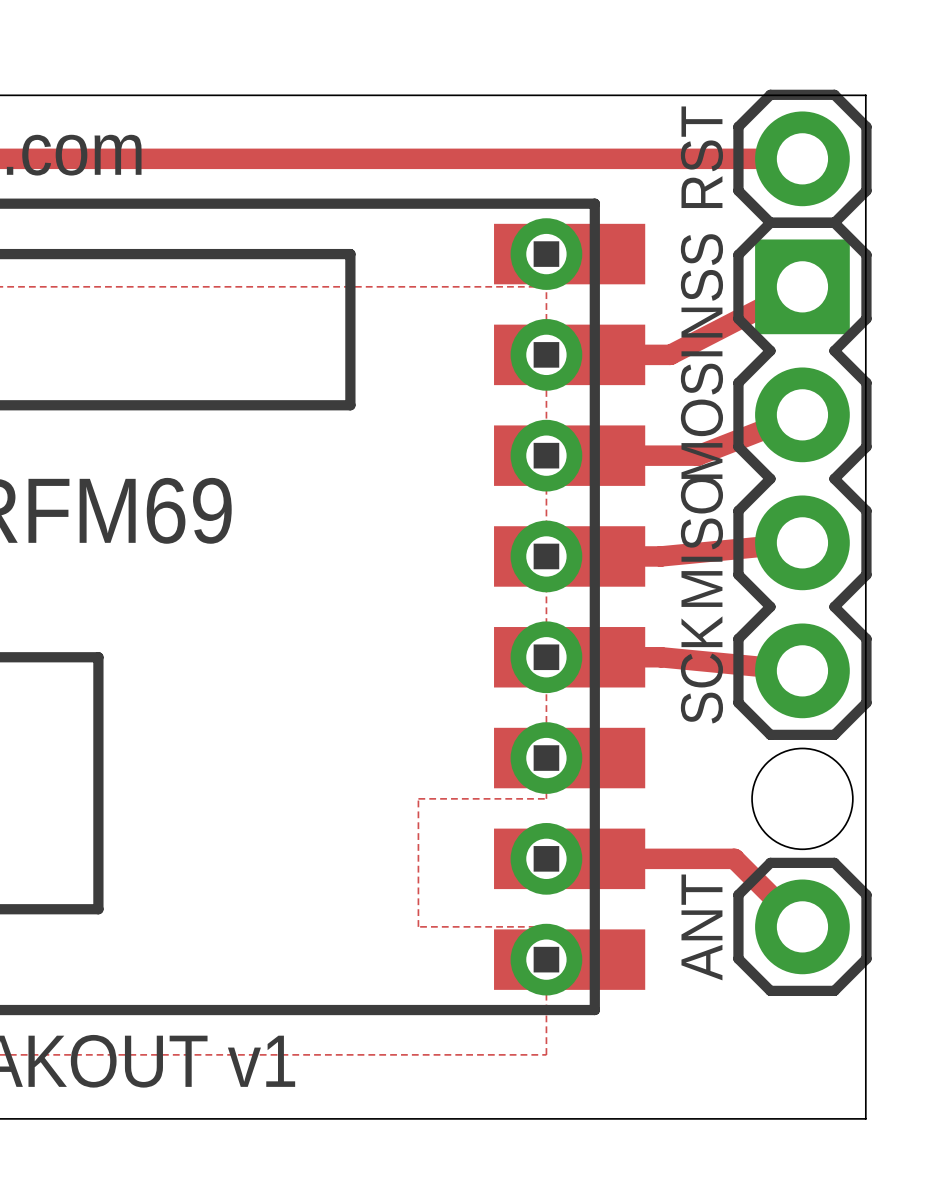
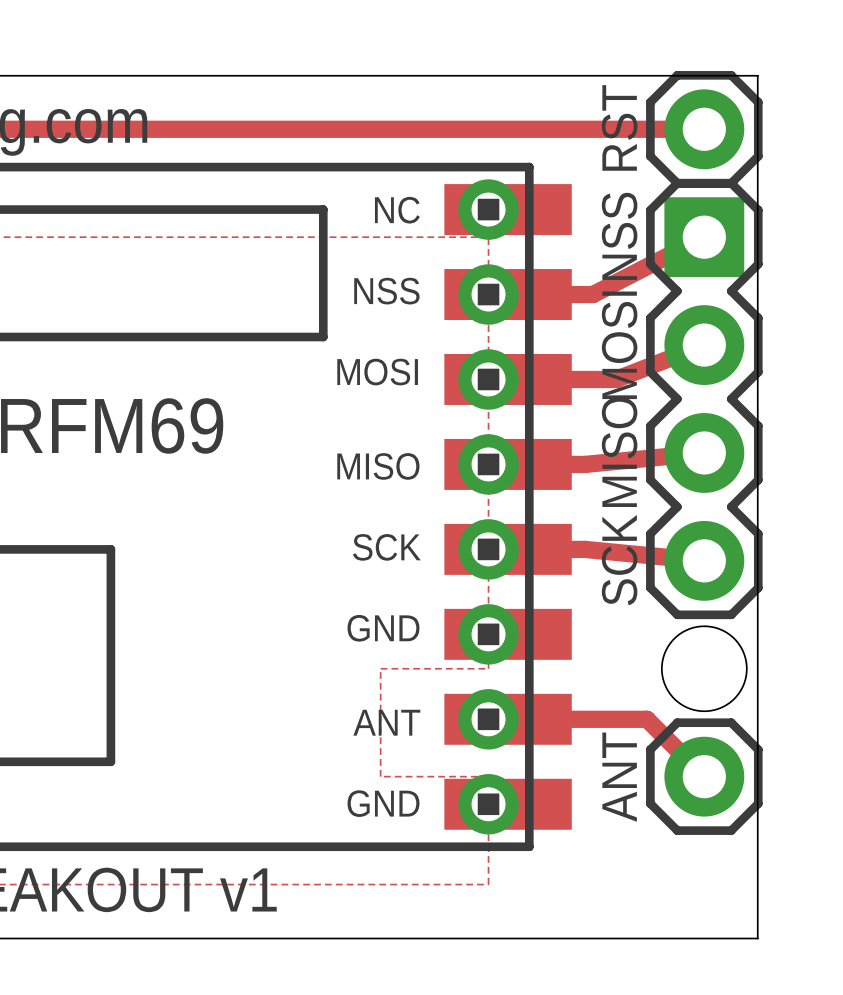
text: none -> NC (397, 210)
text: none -> NSS (386, 291)
text: none -> MOSI (377, 372)
text: none -> MISO (378, 466)
text: none -> SCK (386, 547)
text: none -> GND (383, 628)
text: none -> ANT (386, 722)
text: none -> GND (383, 803)

